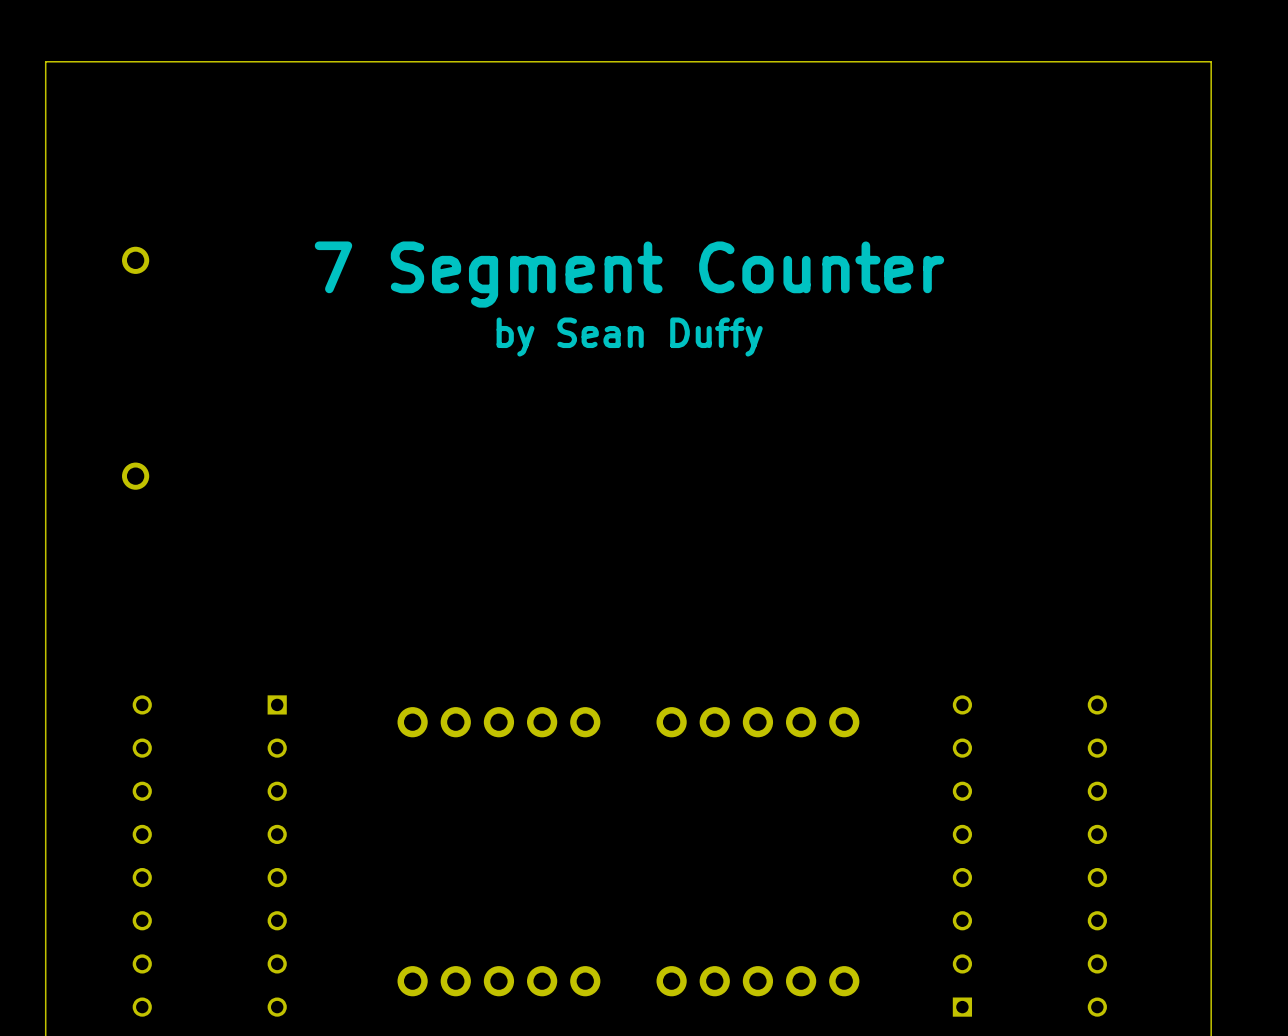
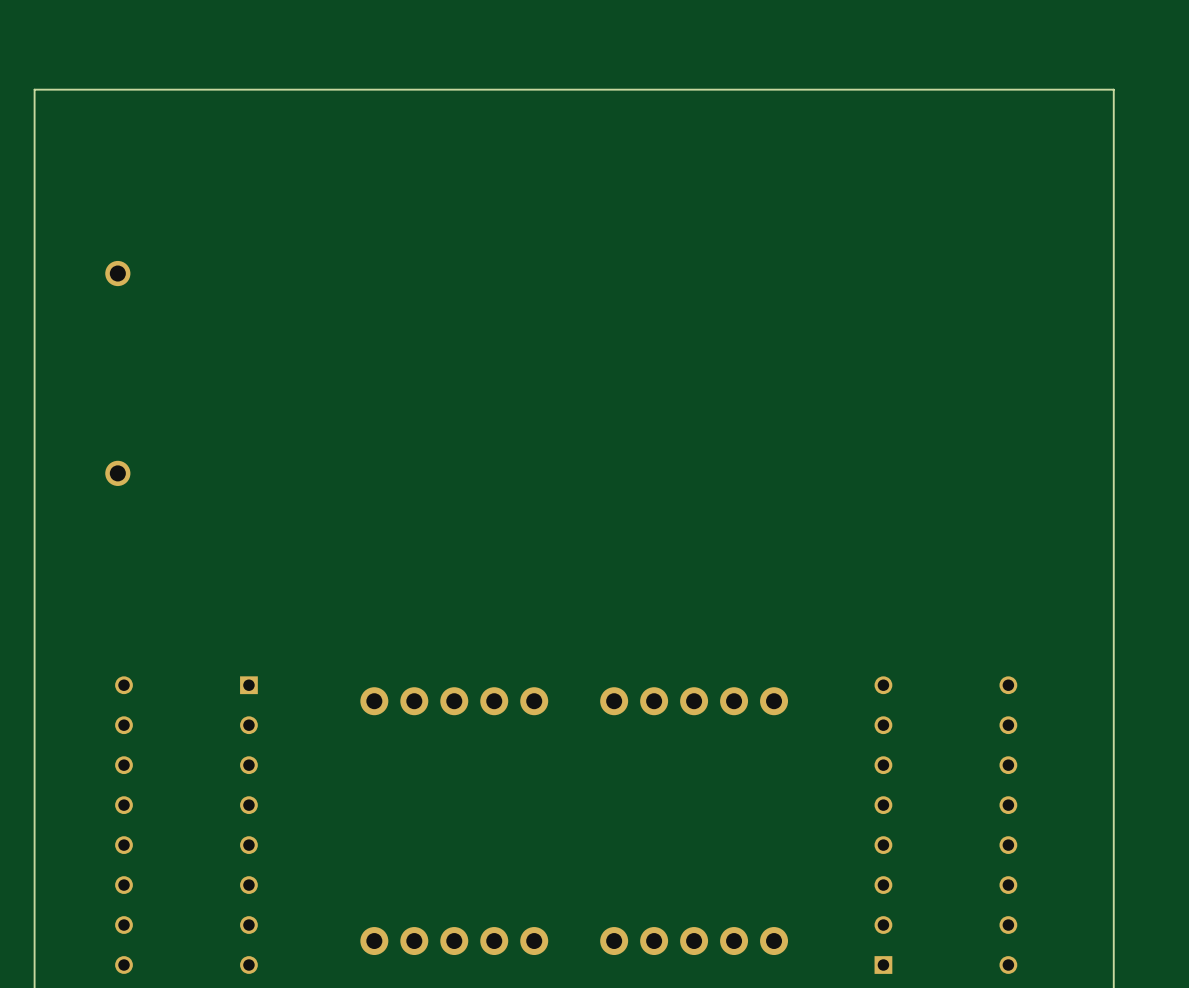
text: 7 Segment Counter (629, 274) -> none
text: by Sean Duffy (629, 337) -> none

